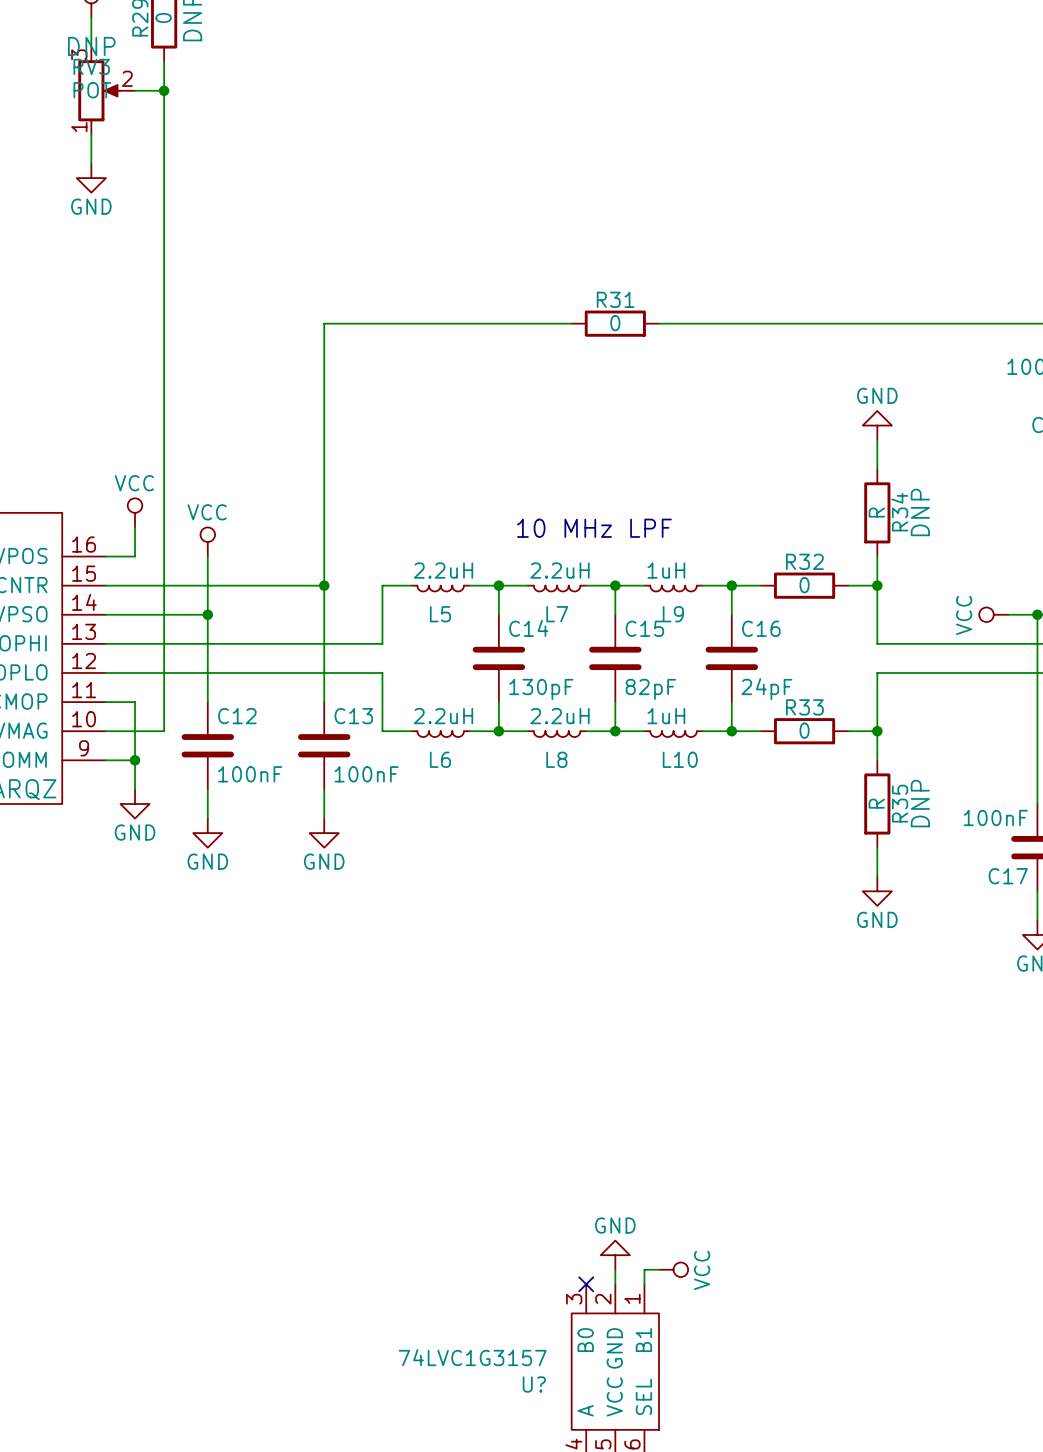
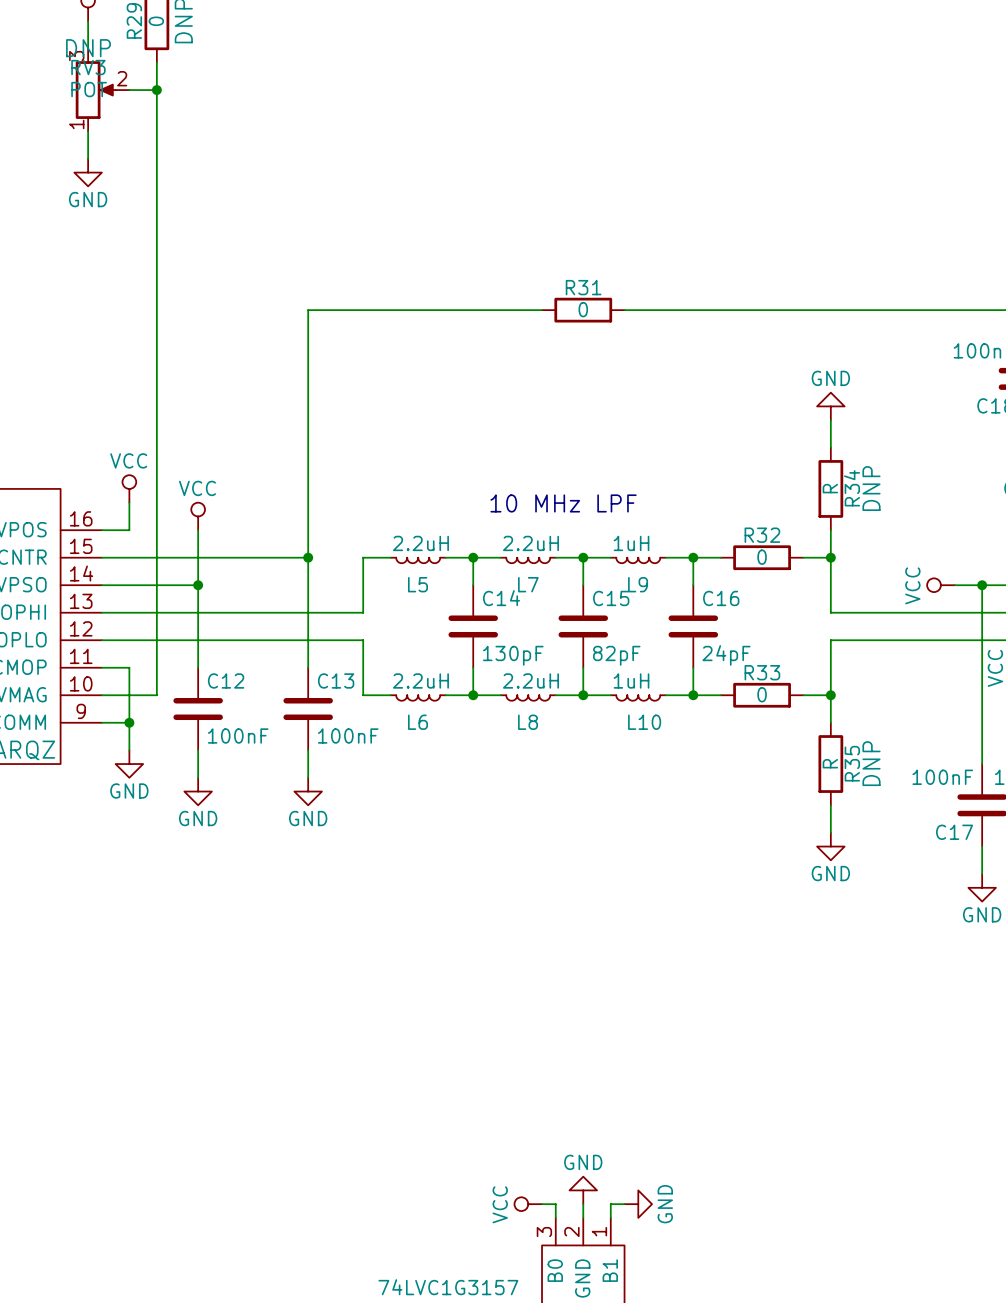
power symbol: none -> VCC (528, 1204)
wire: none -> (542, 1204) (555, 1204) (555, 1217)
power symbol: VCC (673, 1269) -> GND (638, 1204)
no-connect mark: (586, 1284) -> none

